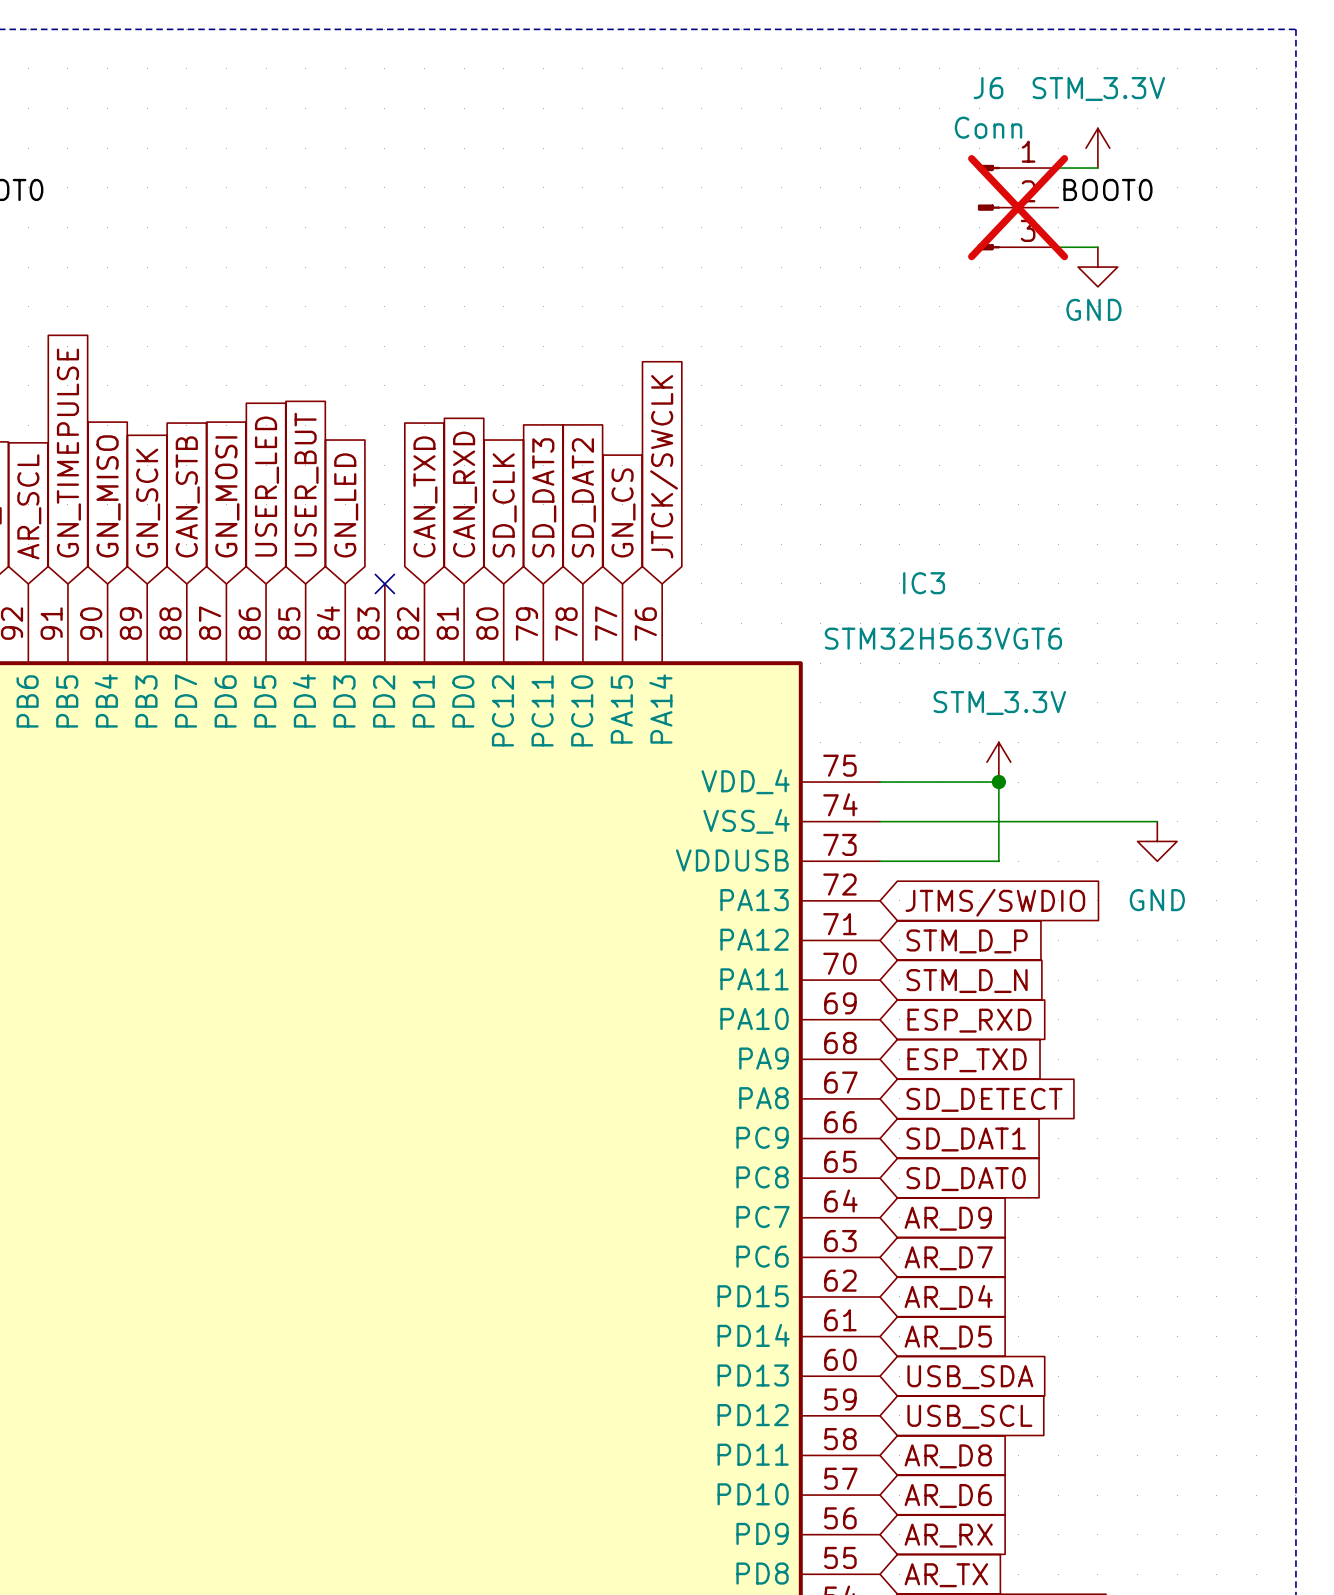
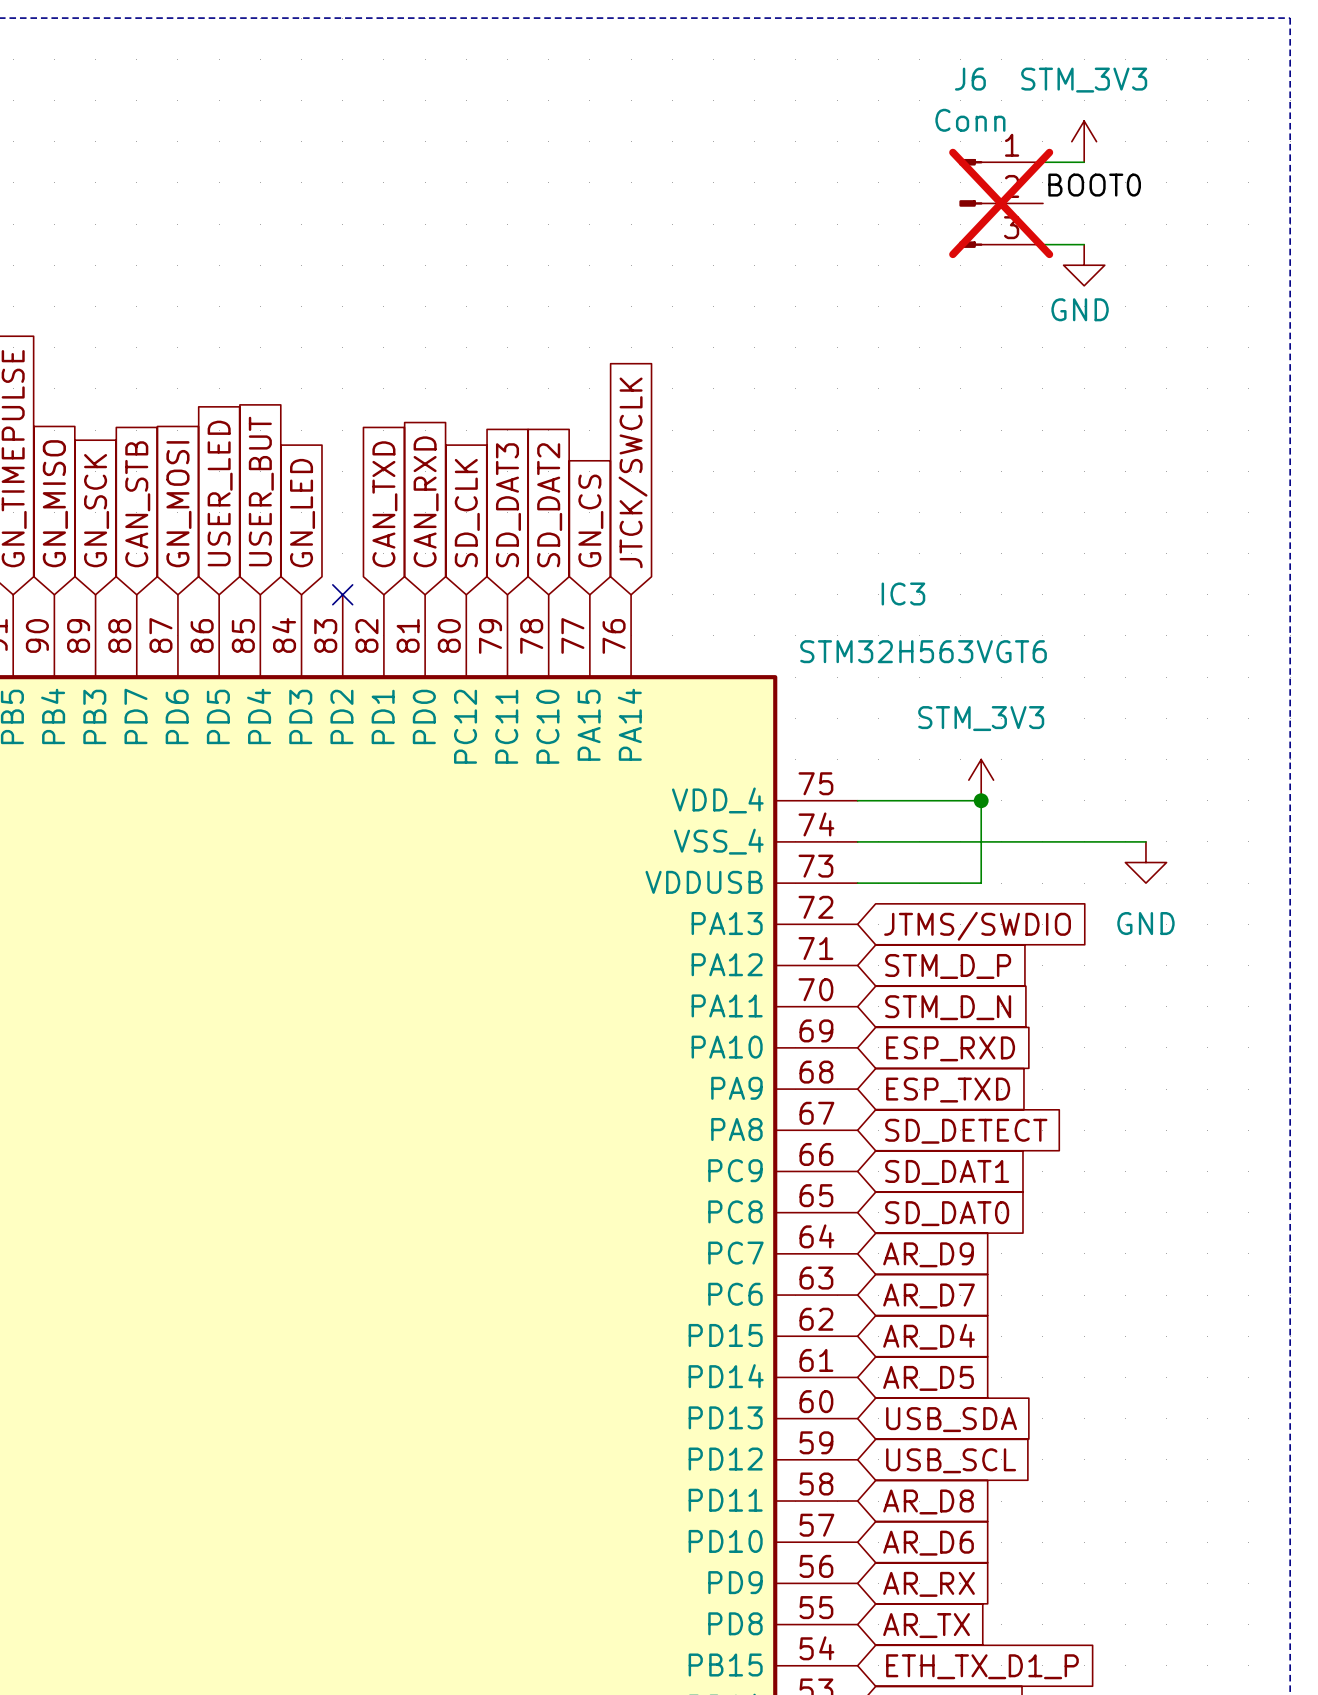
power symbol: STM_3.3V (1097, 148) -> STM_3V3 (1084, 141)
power symbol: STM_3.3V (998, 762) -> STM_3V3 (981, 780)

